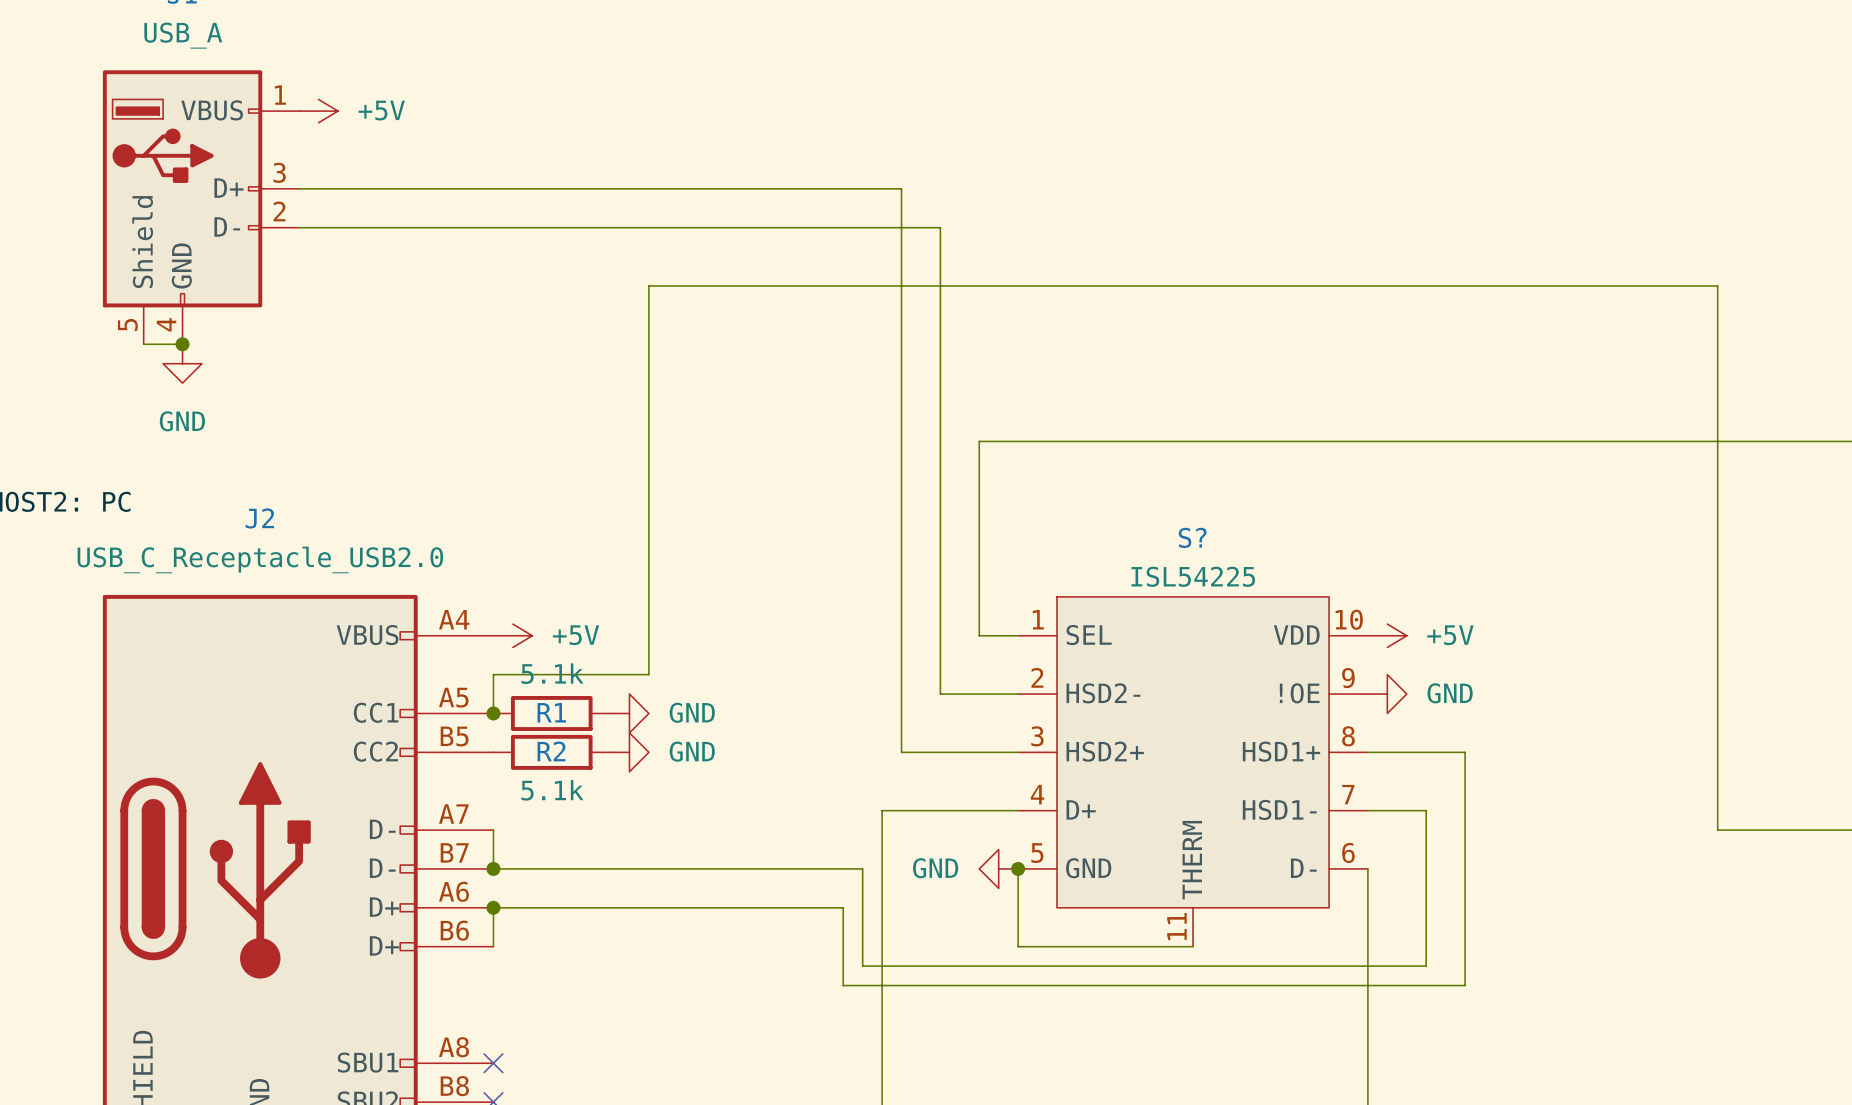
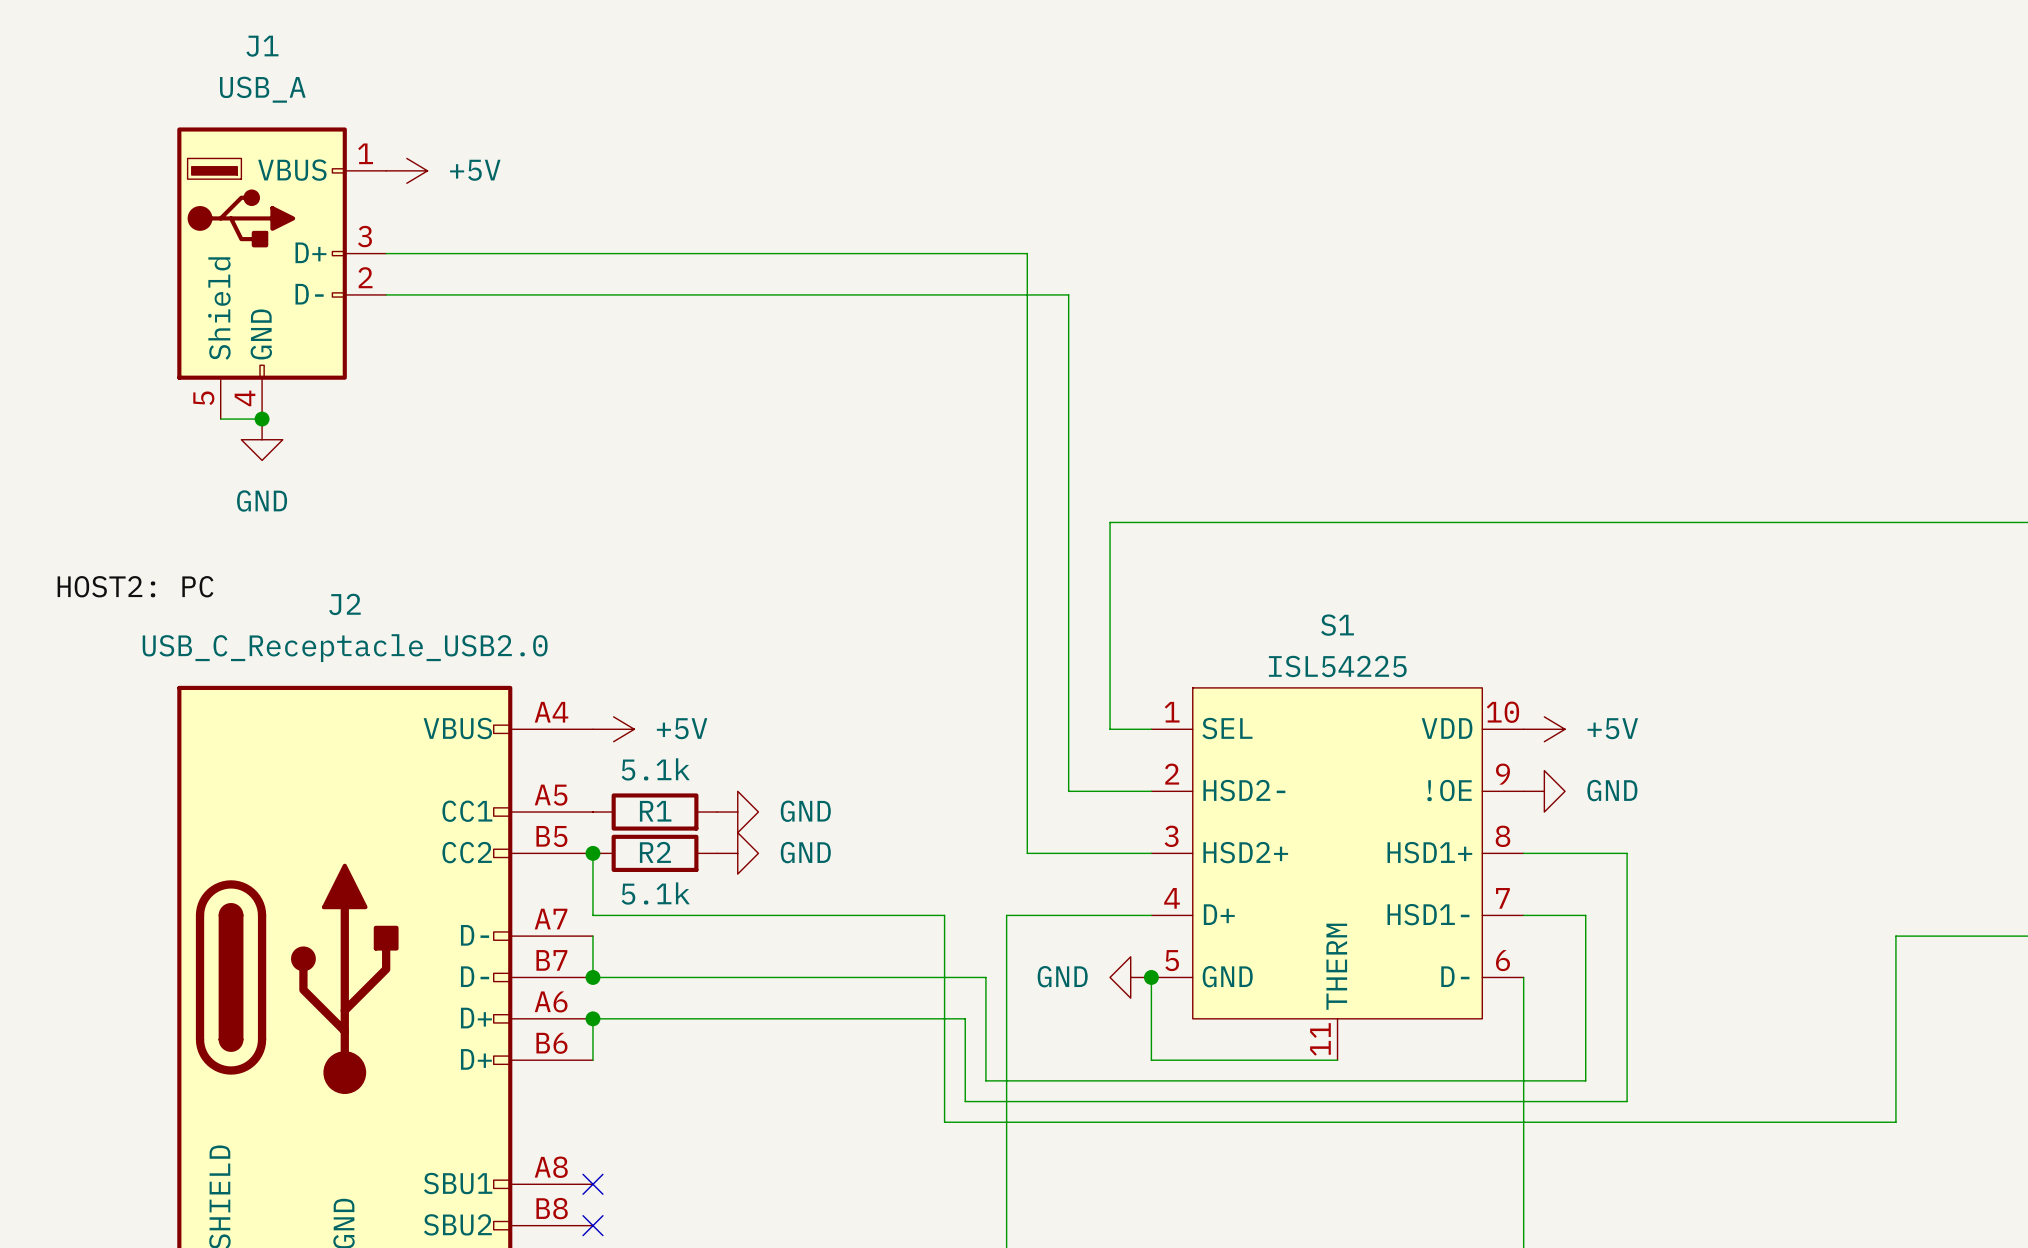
S? name: S? (1192, 537) -> S1 (1337, 625)
wire: (493, 713) (493, 674) (648, 674) (648, 285) (1717, 285) (1717, 830) -> (592, 853) (592, 915) (944, 915) (944, 1122) (1895, 1122) (1895, 936)
junction position: (493, 713) -> (592, 853)

